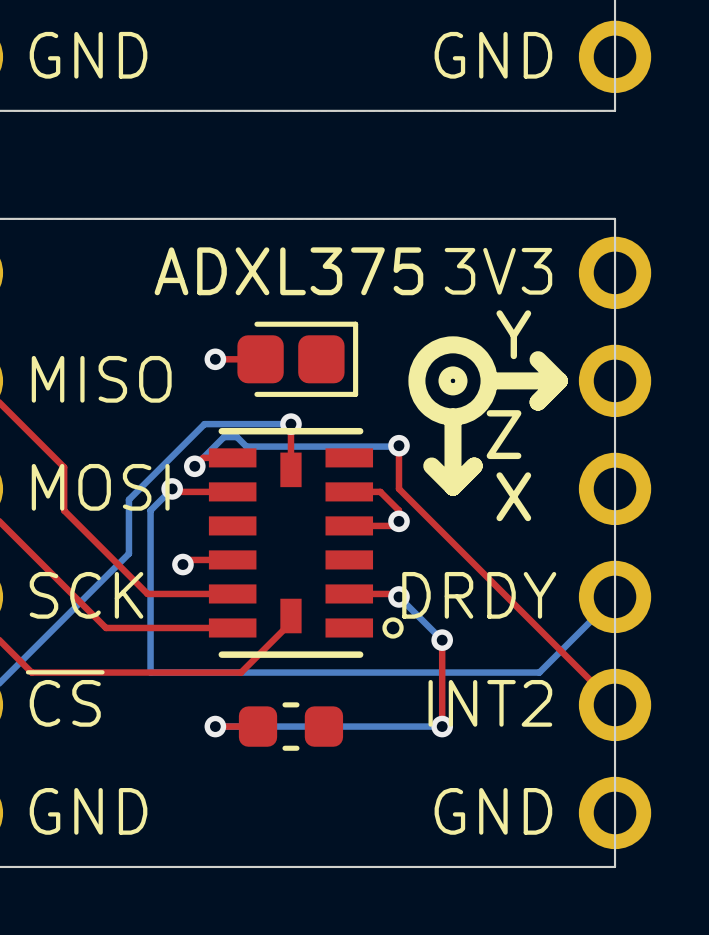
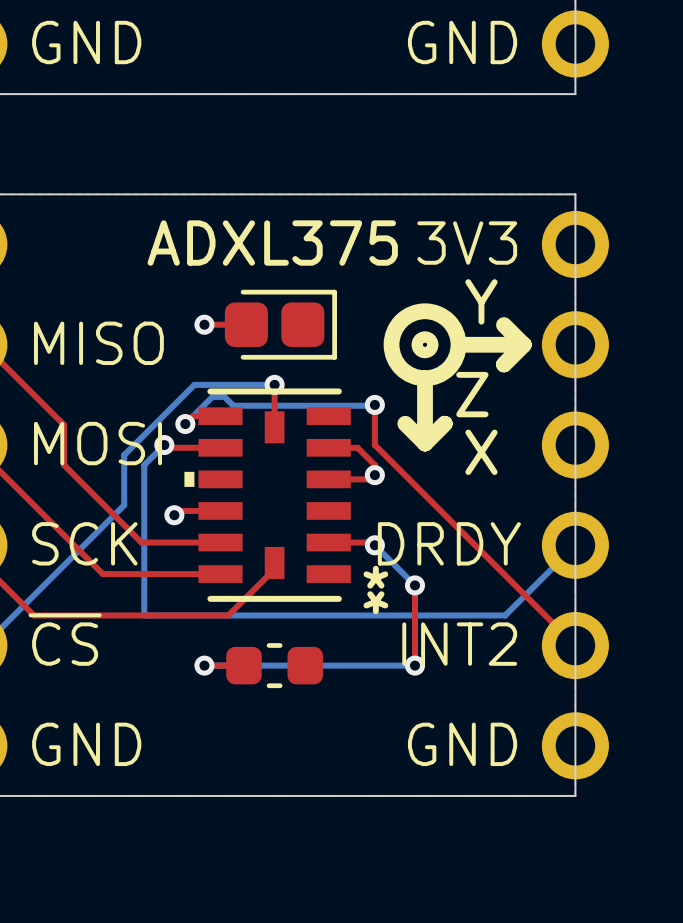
part footprint: [208, 427, 404, 658] -> [184, 388, 351, 602]

